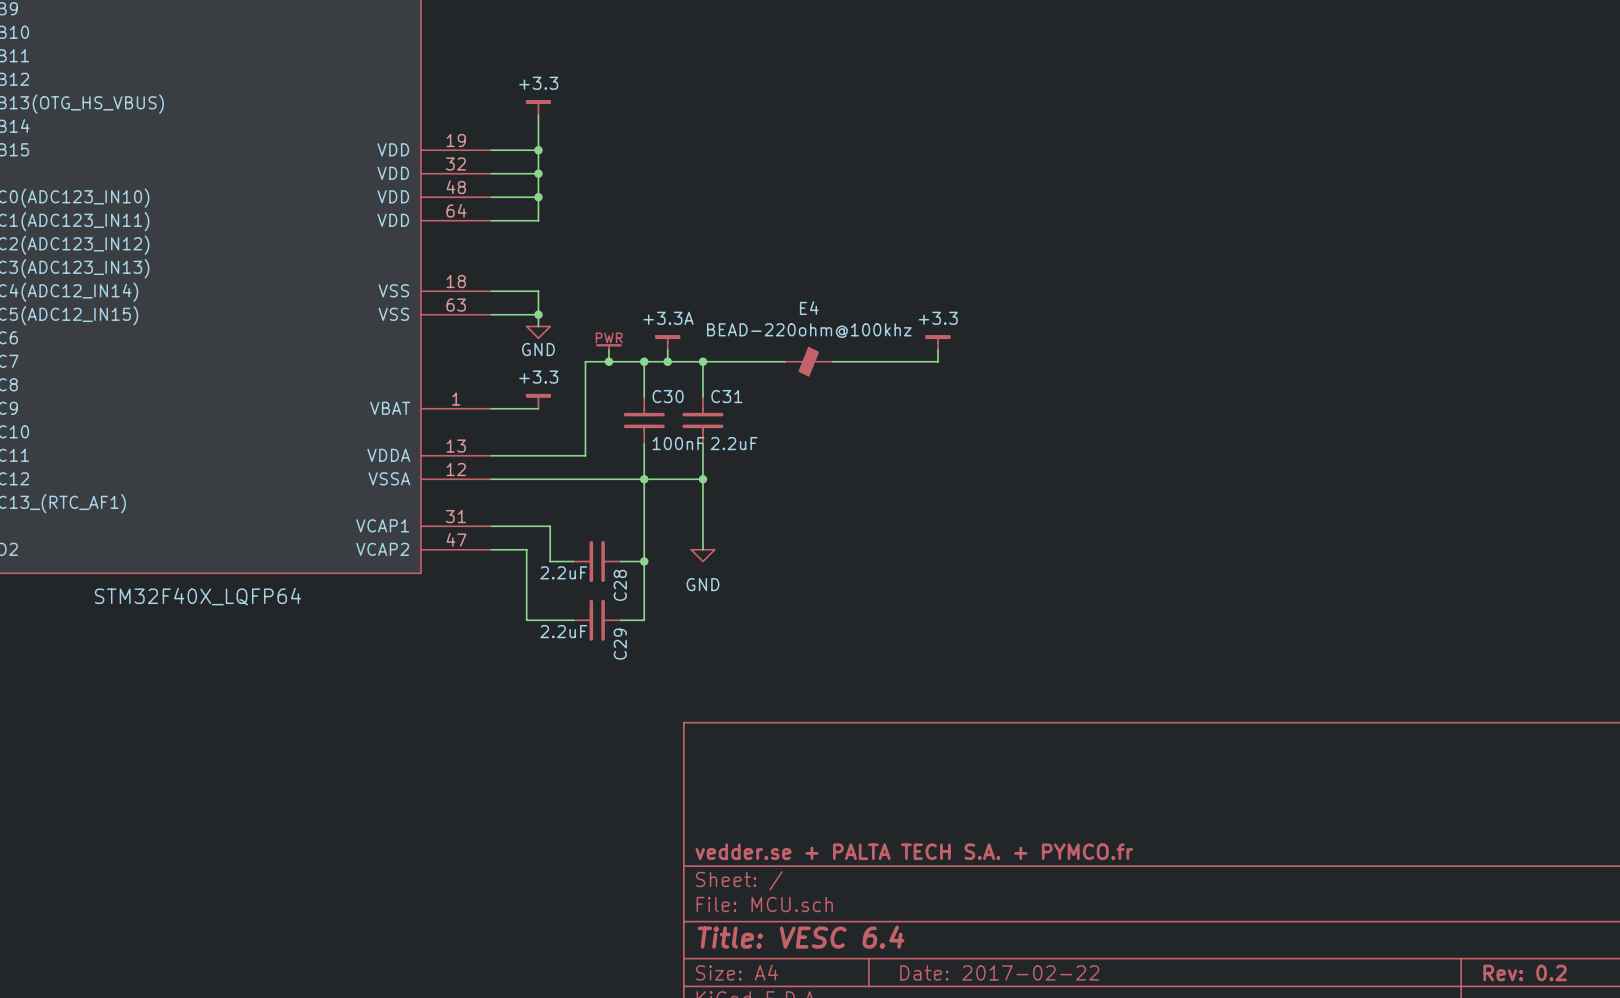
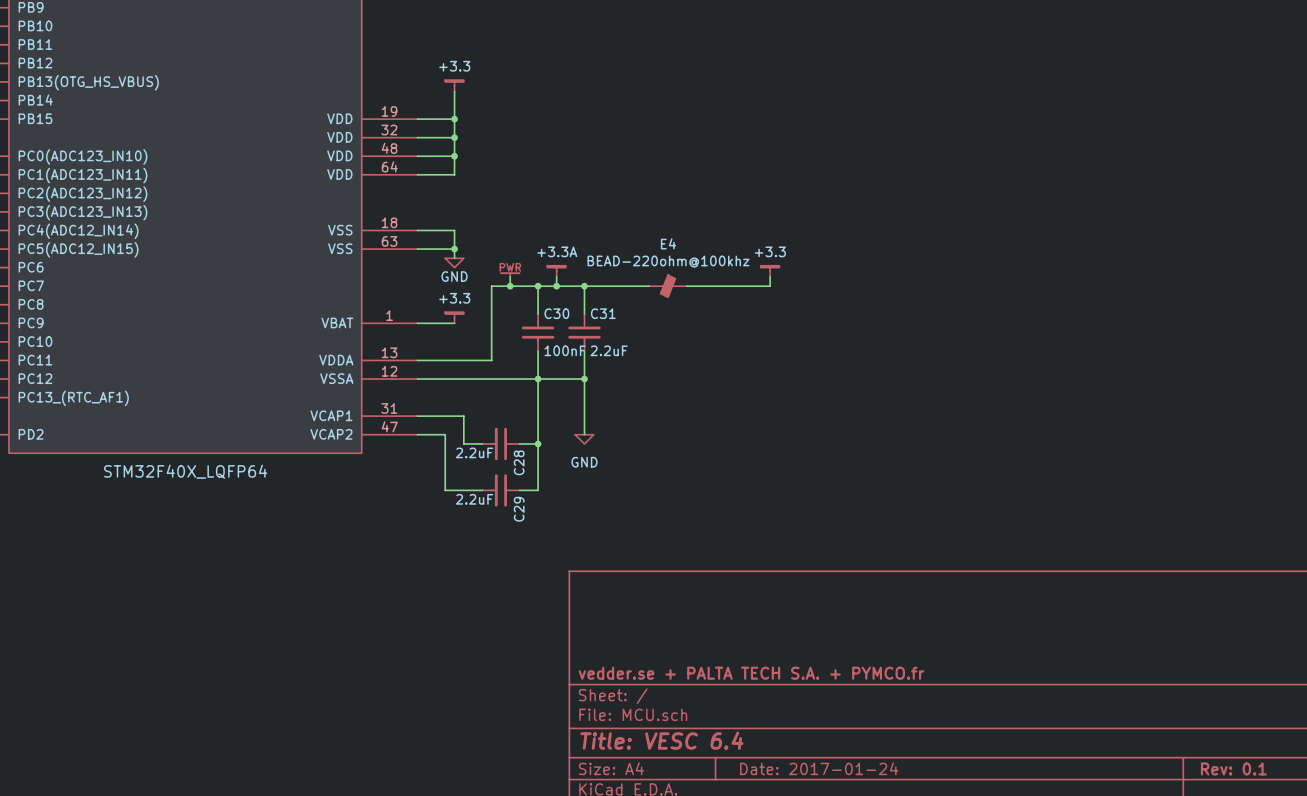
title block: Date: 2017-02-22 (999, 972) -> Date: 2017-01-24 (819, 768)
title block: Rev: 0.2 (1525, 972) -> Rev: 0.1 (1233, 768)

